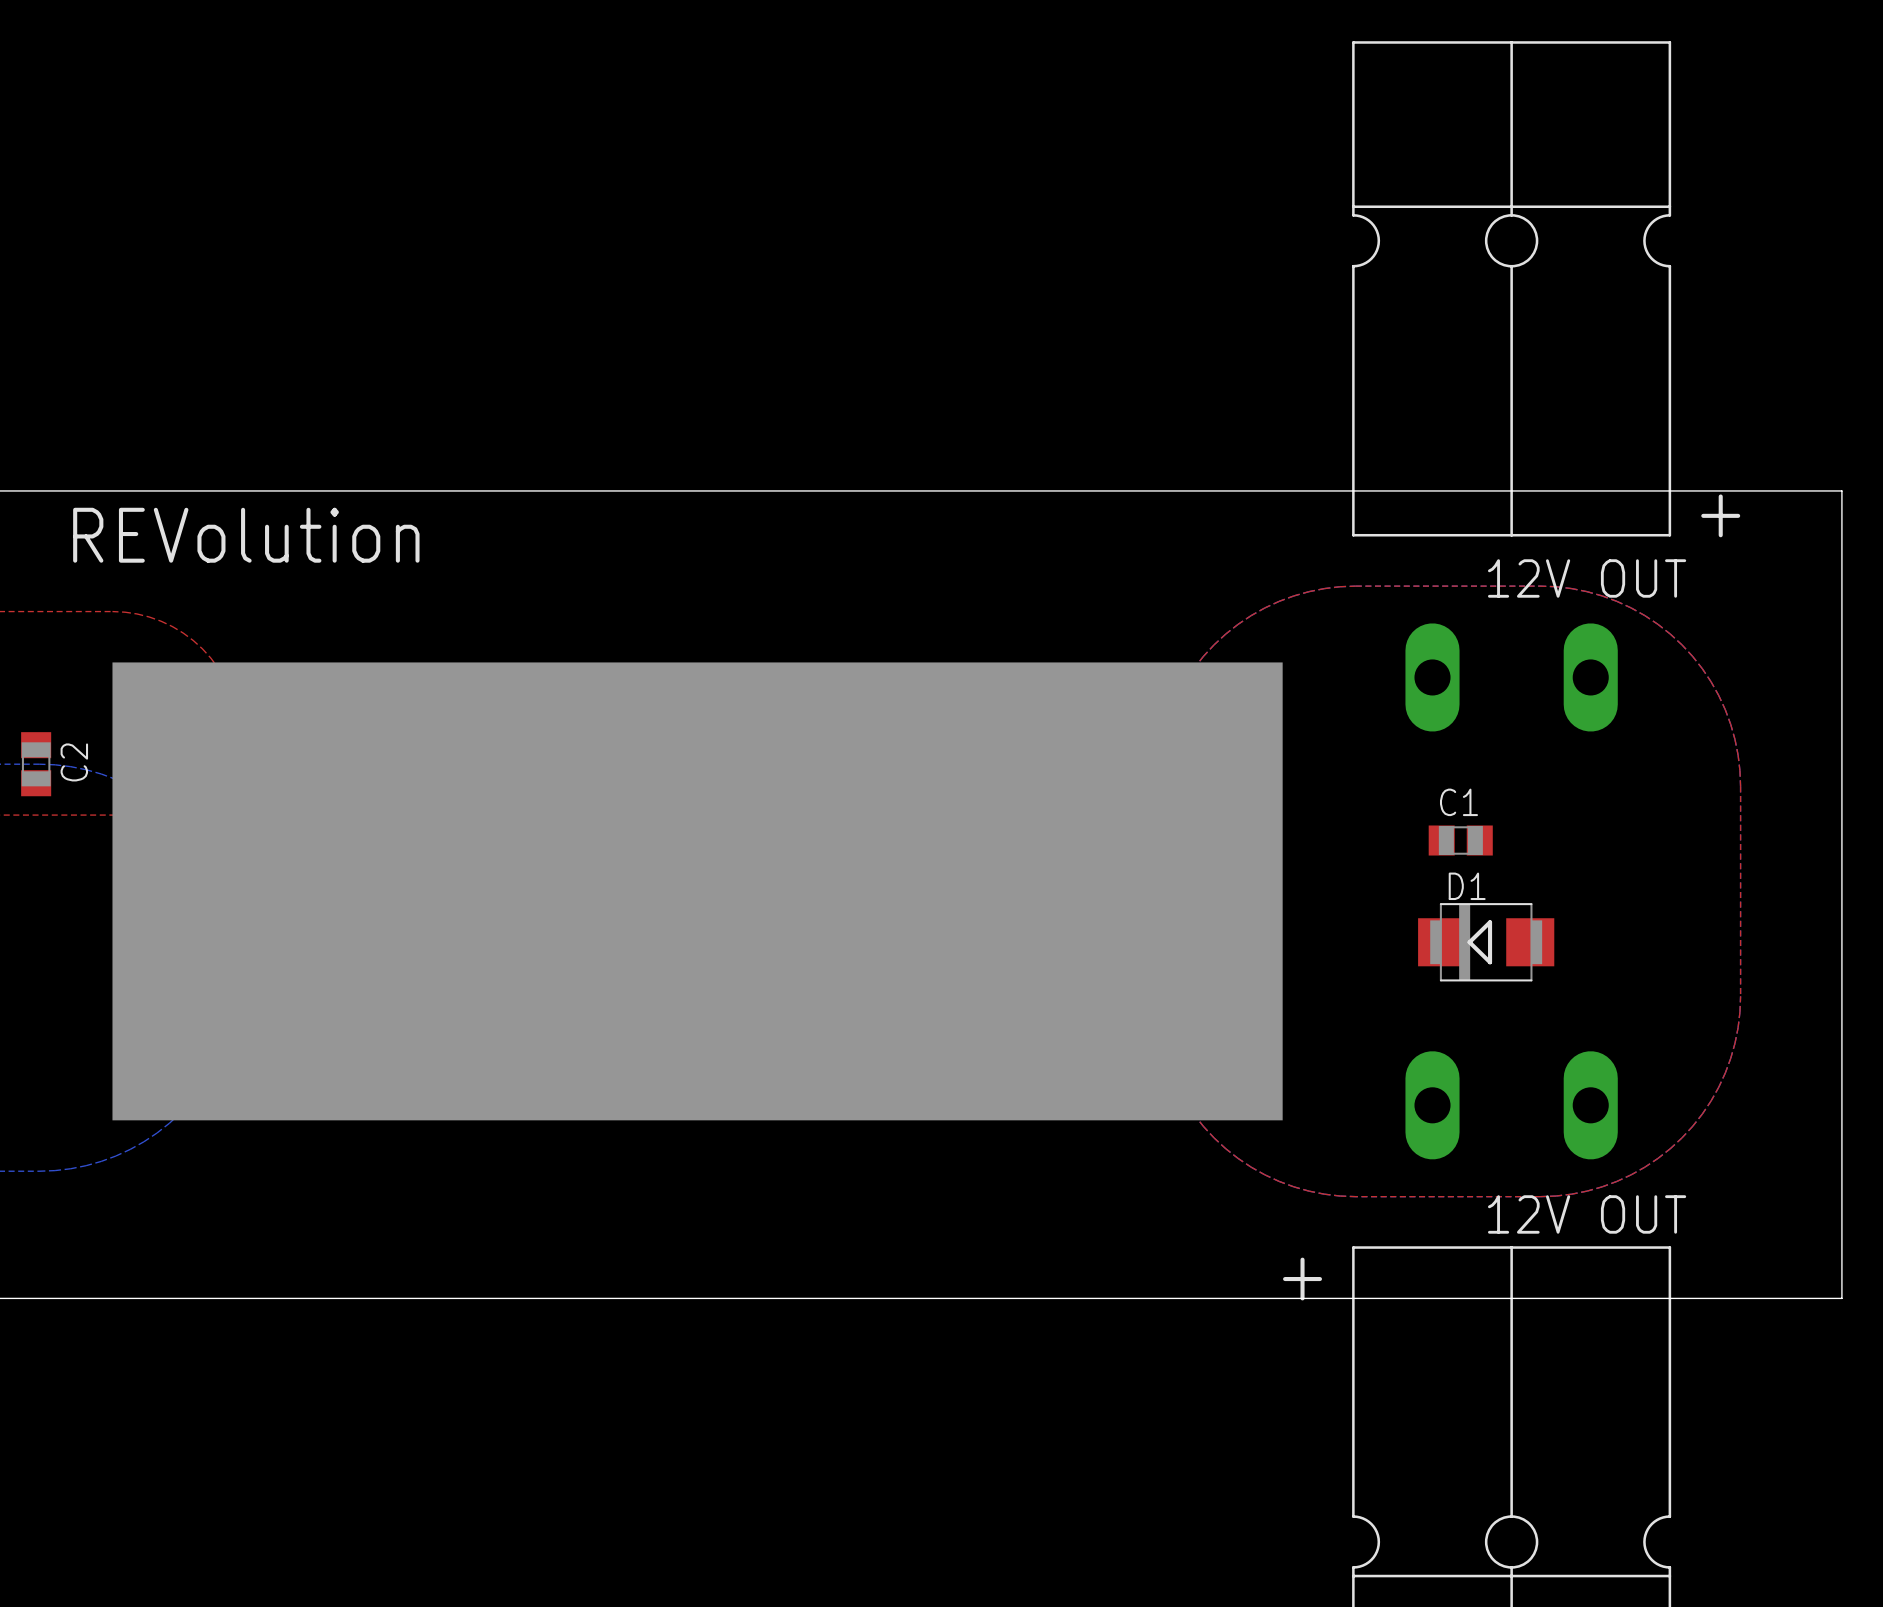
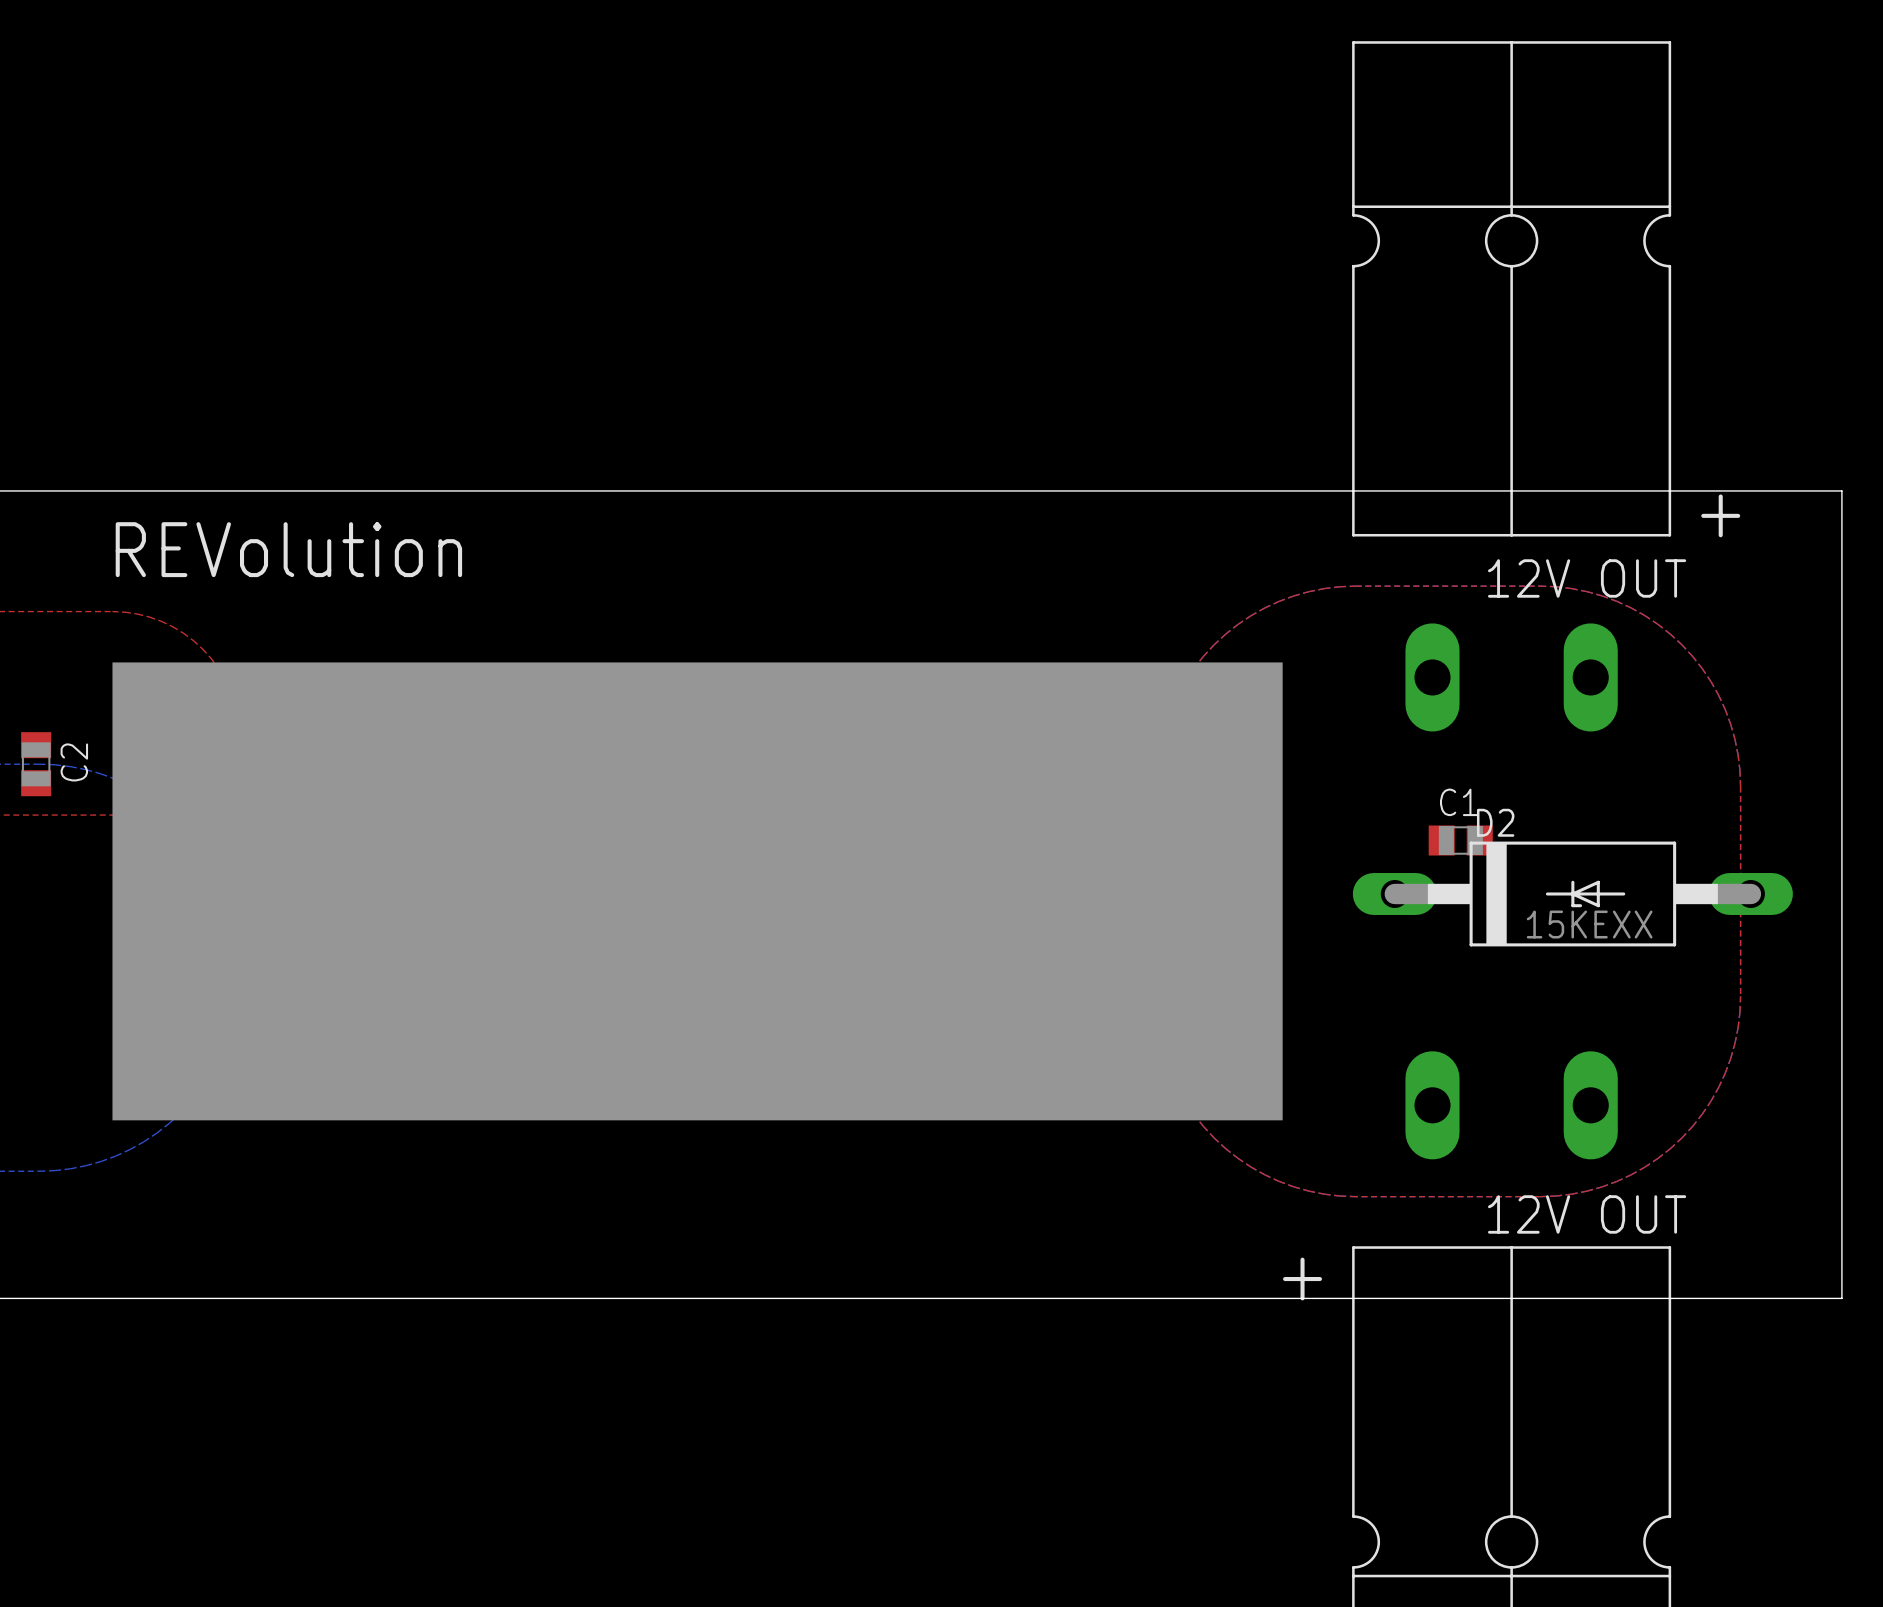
text position: REVolution (246, 535) -> REVolution (288, 549)
D2: none -> 15KEXX (1572, 893)
D1: (1486, 942) -> none

